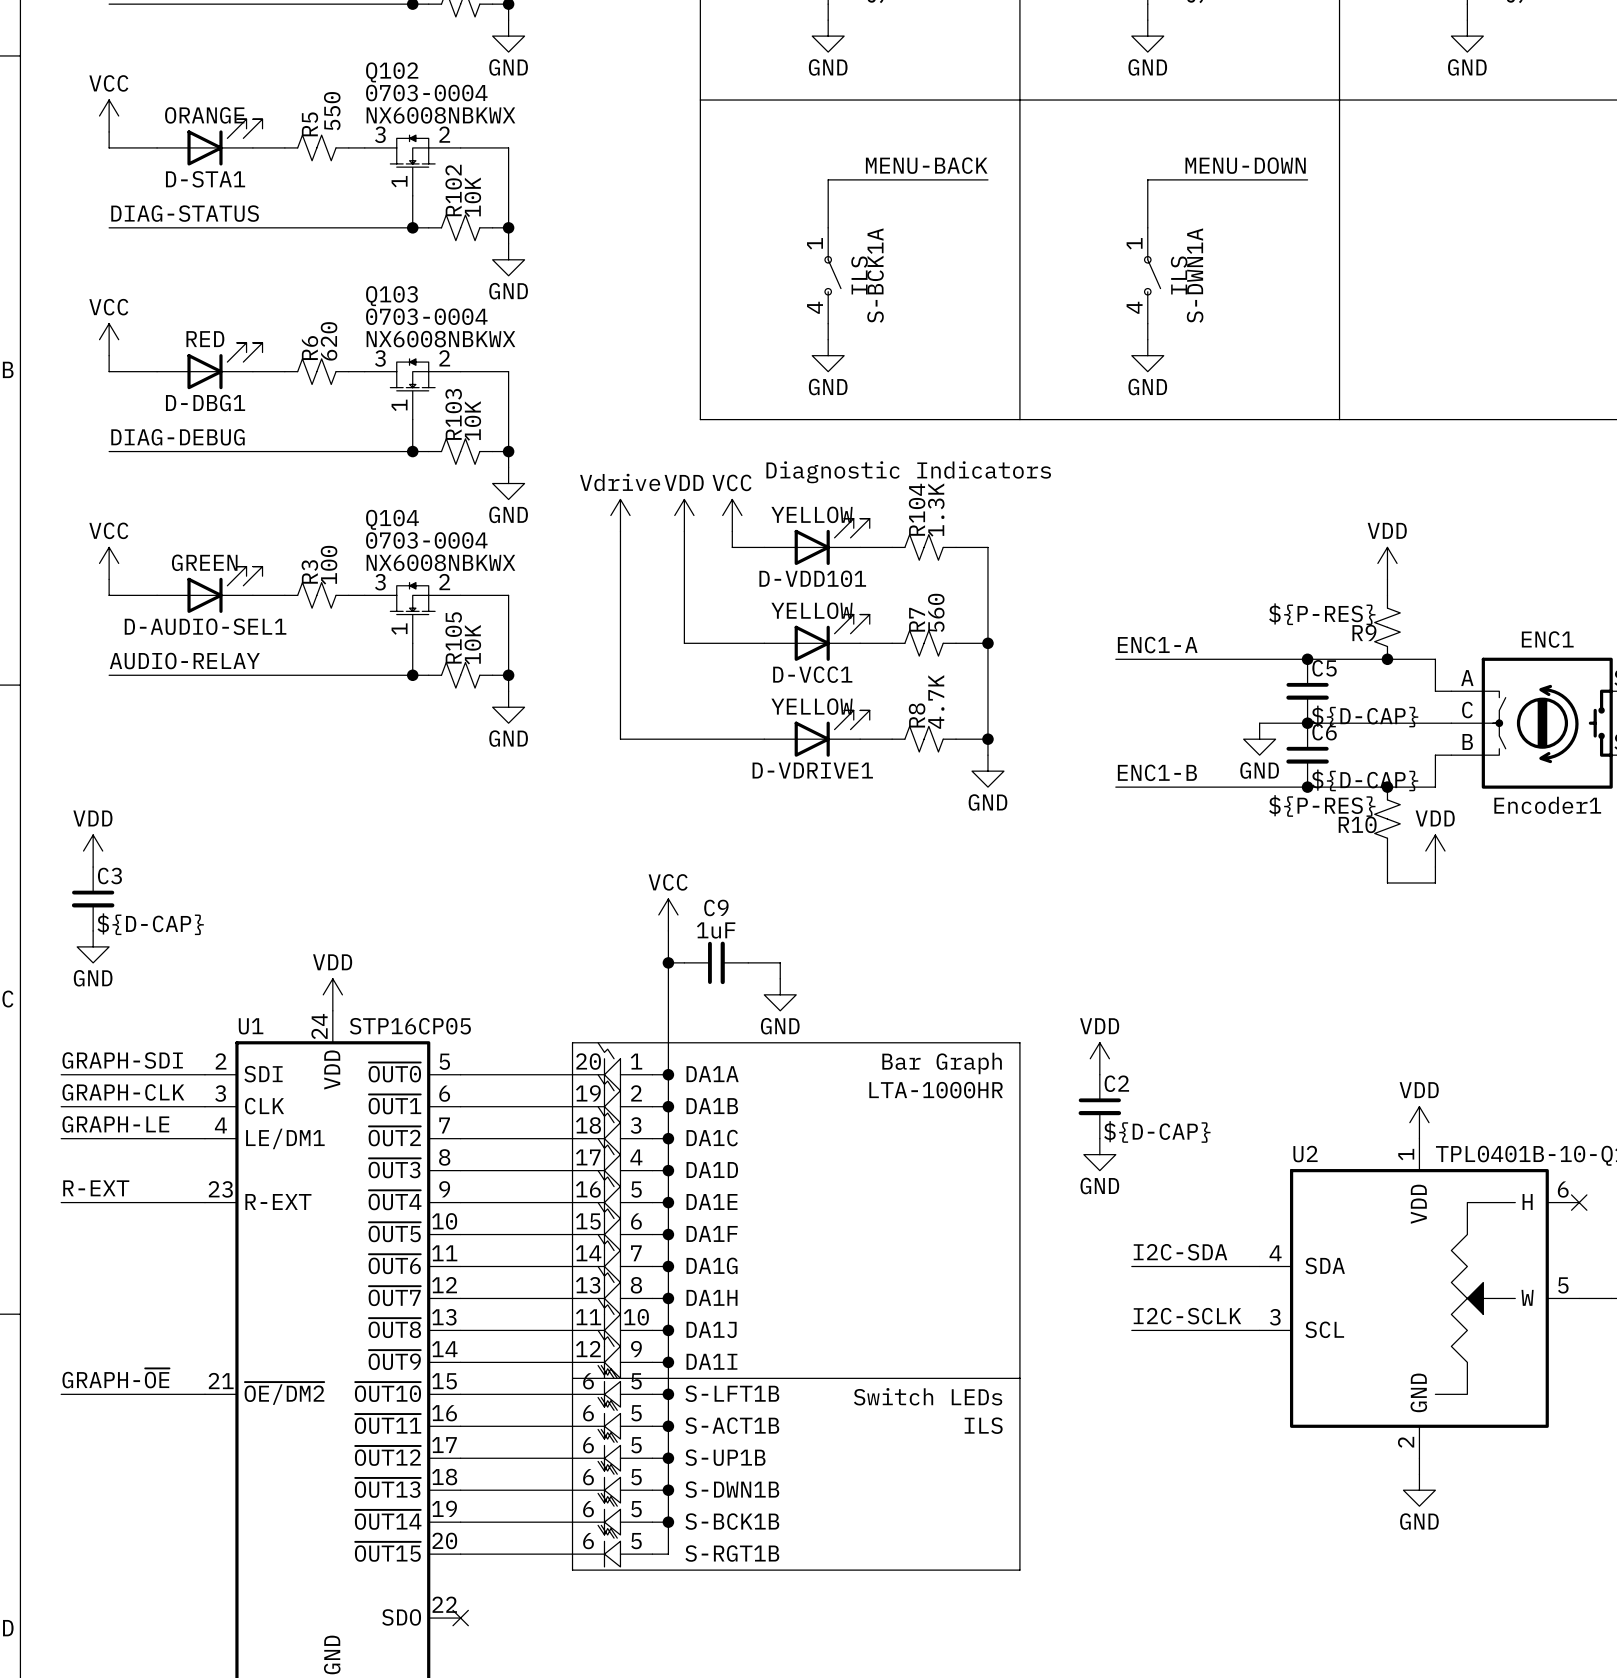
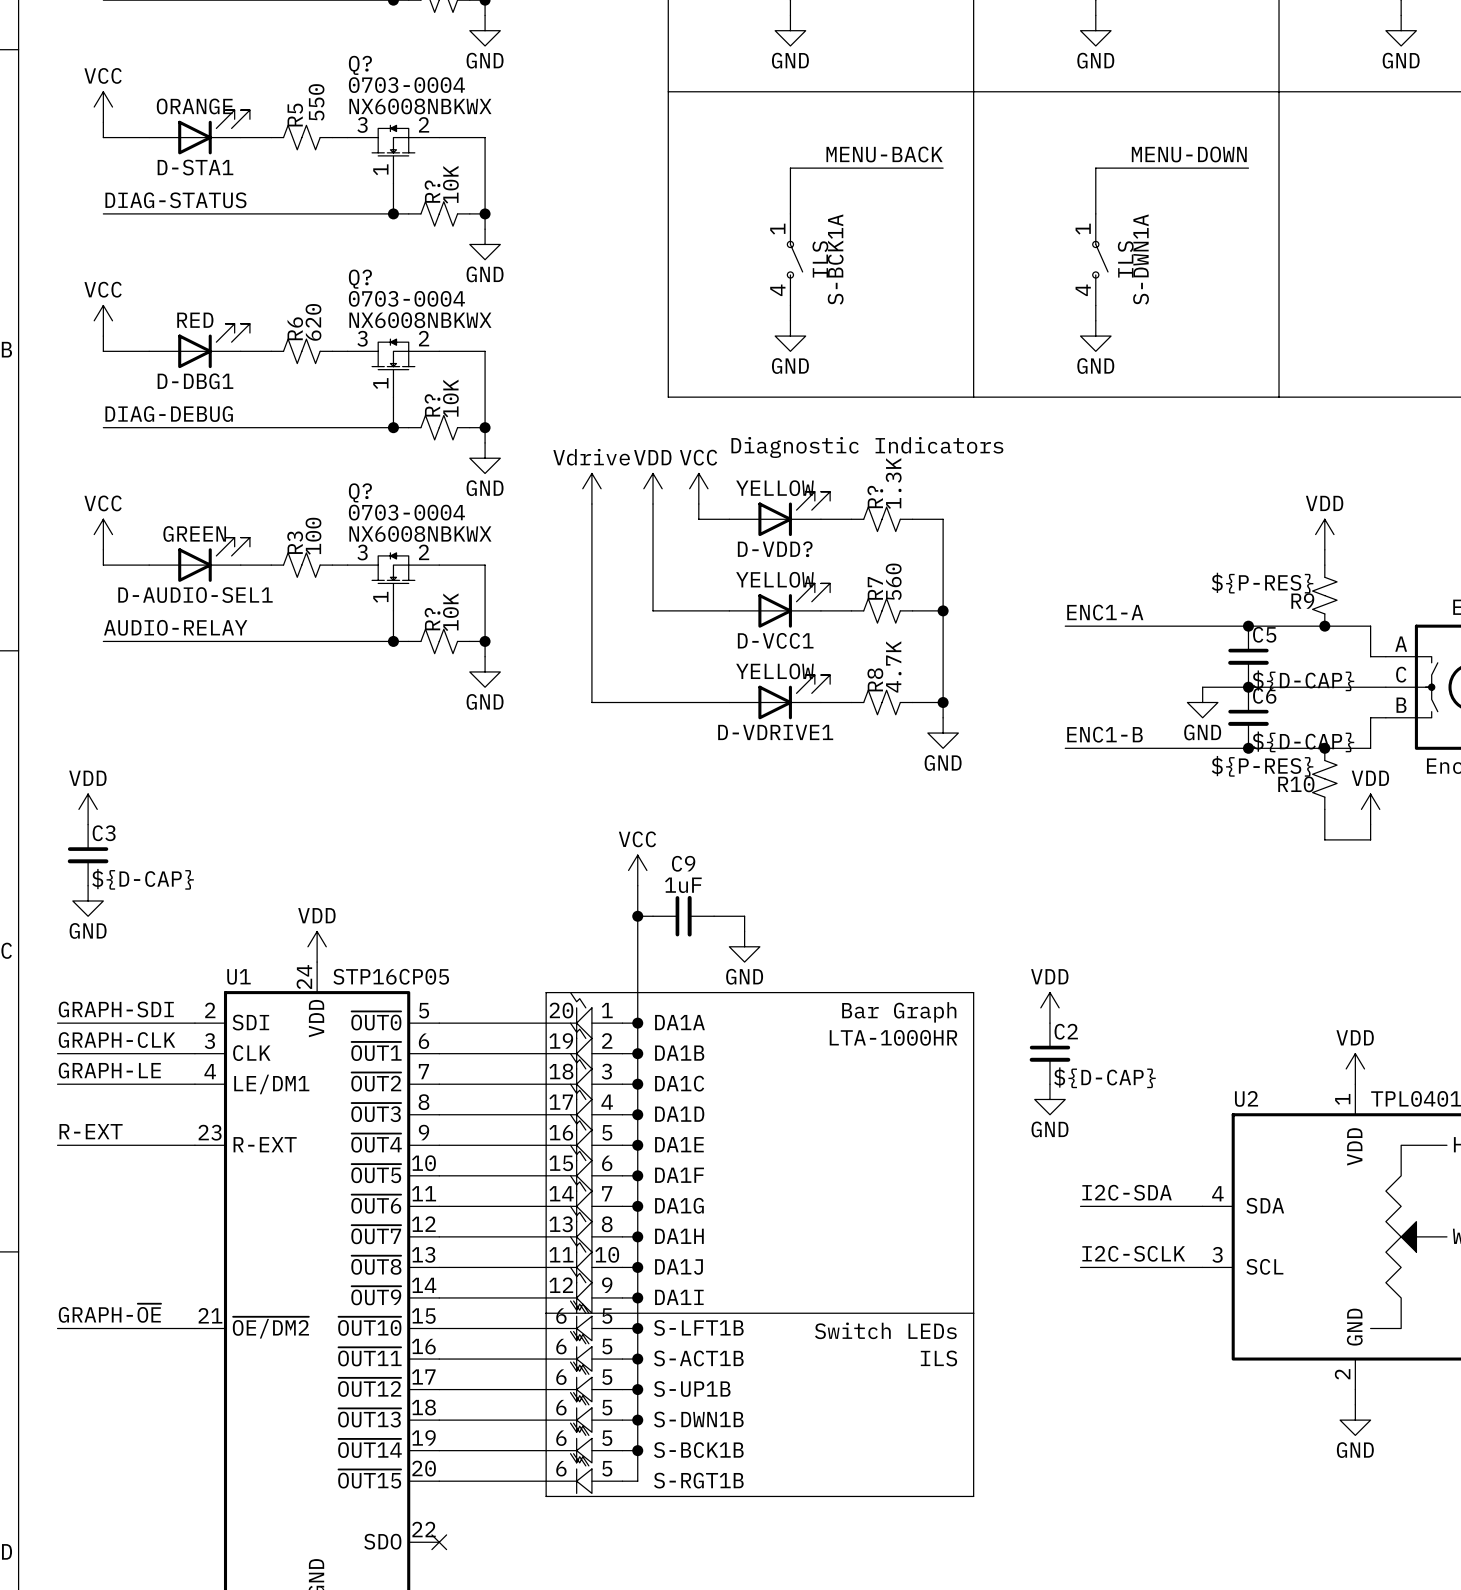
Q102 name: Q102 (392, 72) -> Q? (360, 65)
R102 name: R102 (453, 190) -> R? (432, 191)
Q103 name: Q103 (391, 296) -> Q? (360, 279)
R103 name: R103 (453, 414) -> R? (432, 405)
R104 name: R104 (917, 509) -> R? (875, 497)
Q104 name: Q104 (392, 519) -> Q? (360, 492)
D-VDD101 name: D-VDD101 (812, 578) -> D-VDD? (775, 549)
R105 name: R105 (453, 637) -> R? (432, 619)

